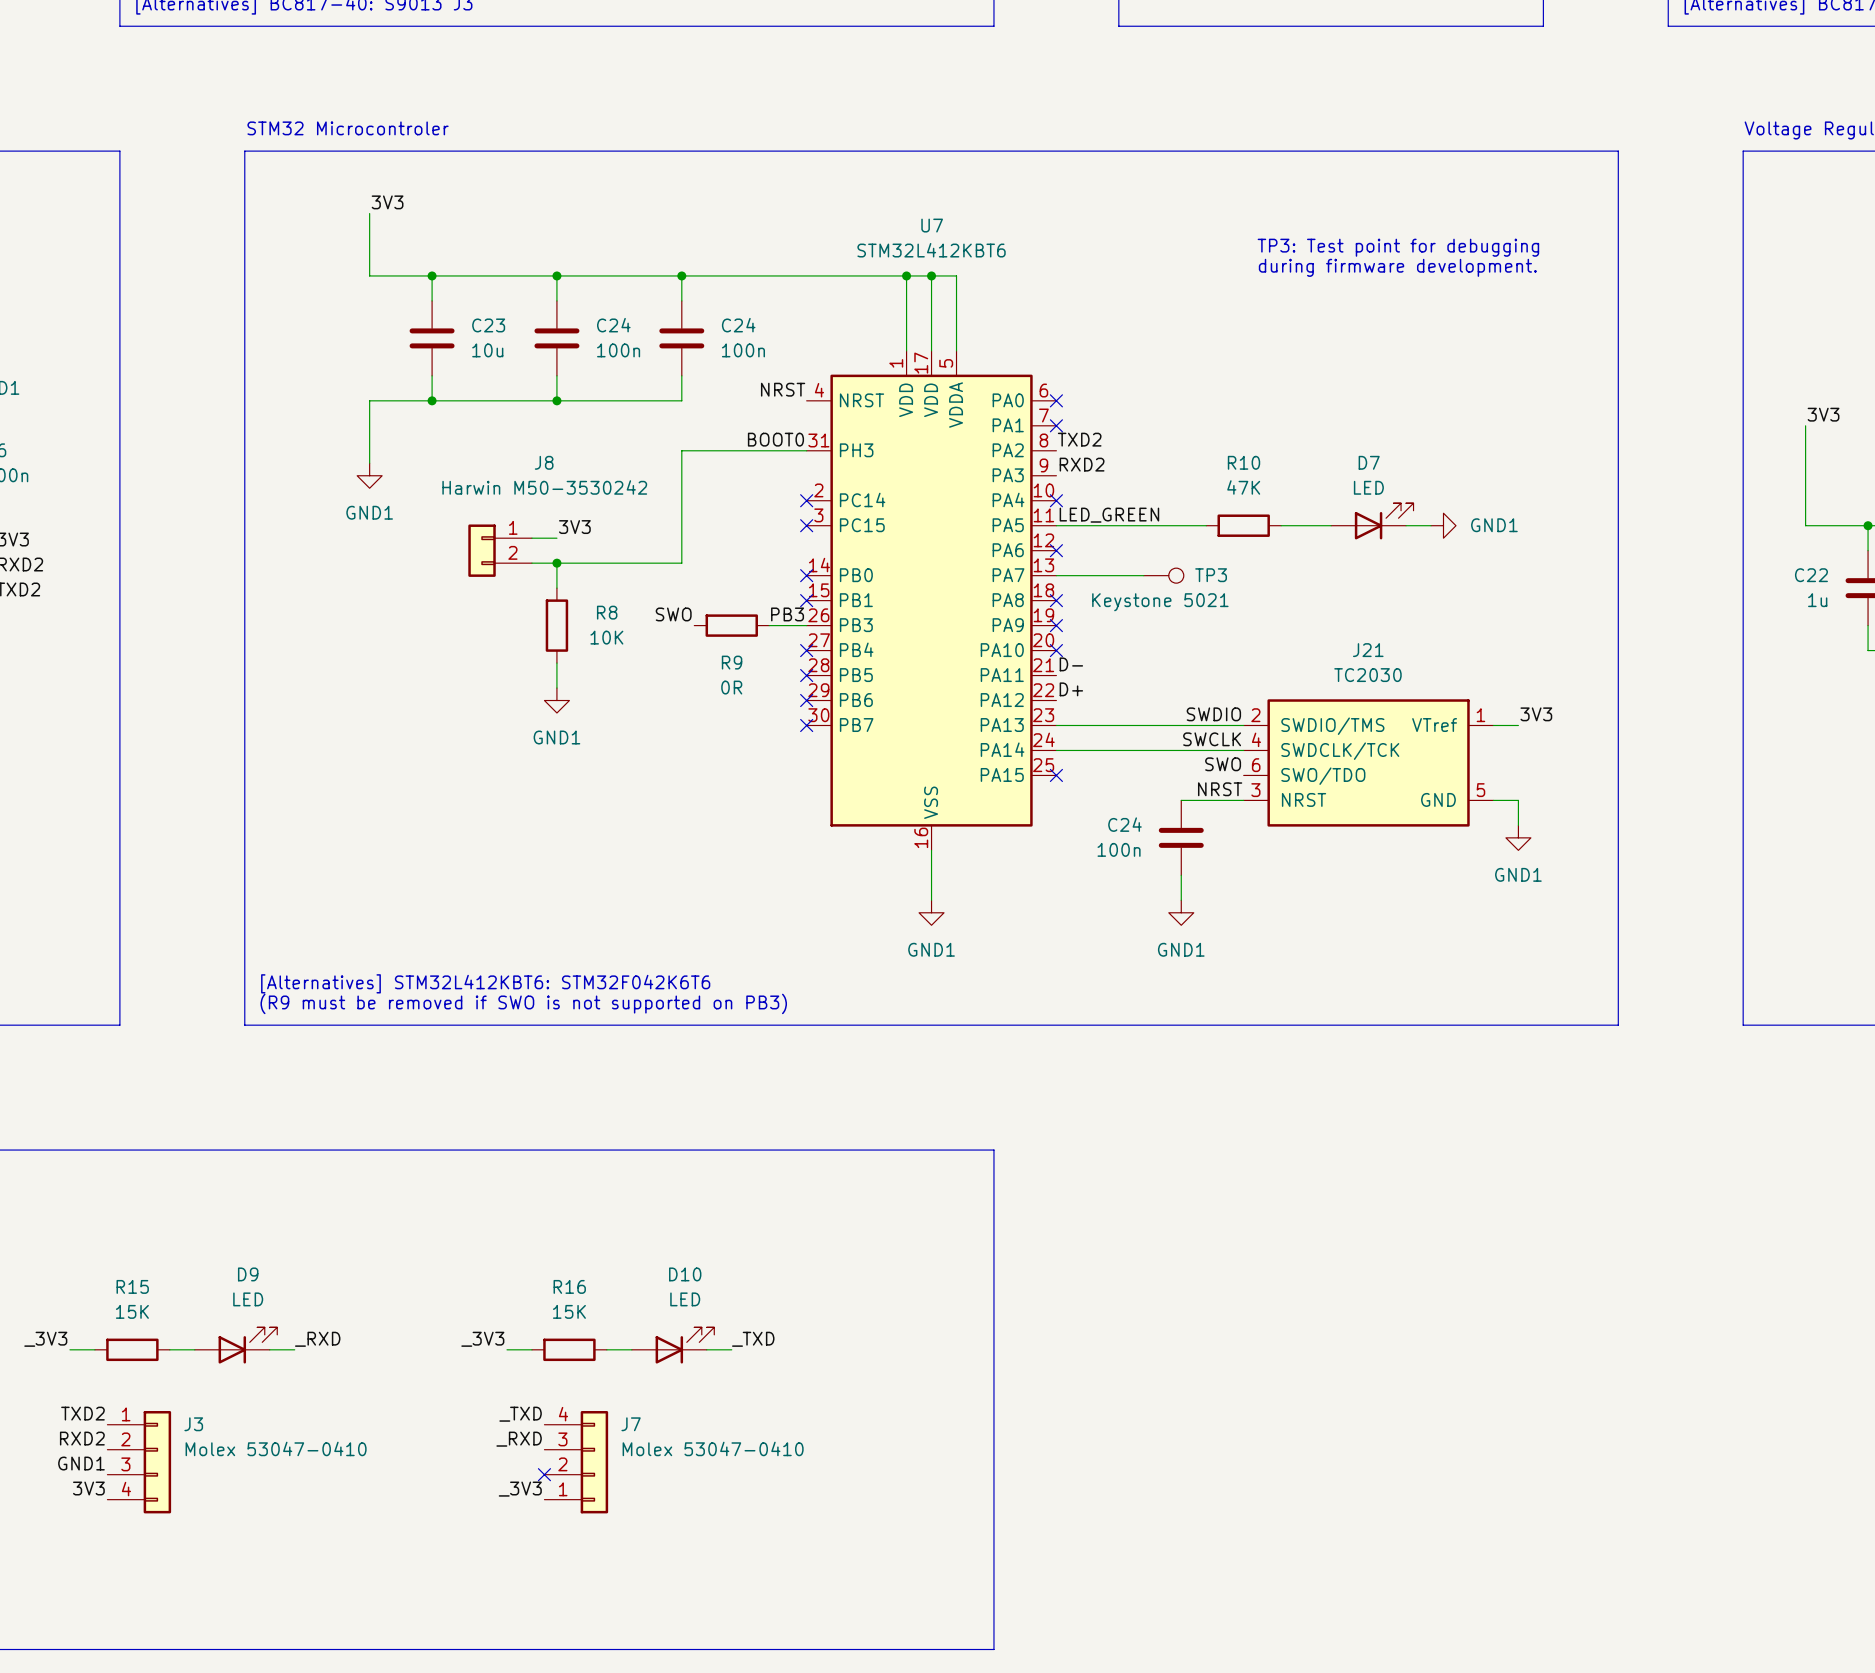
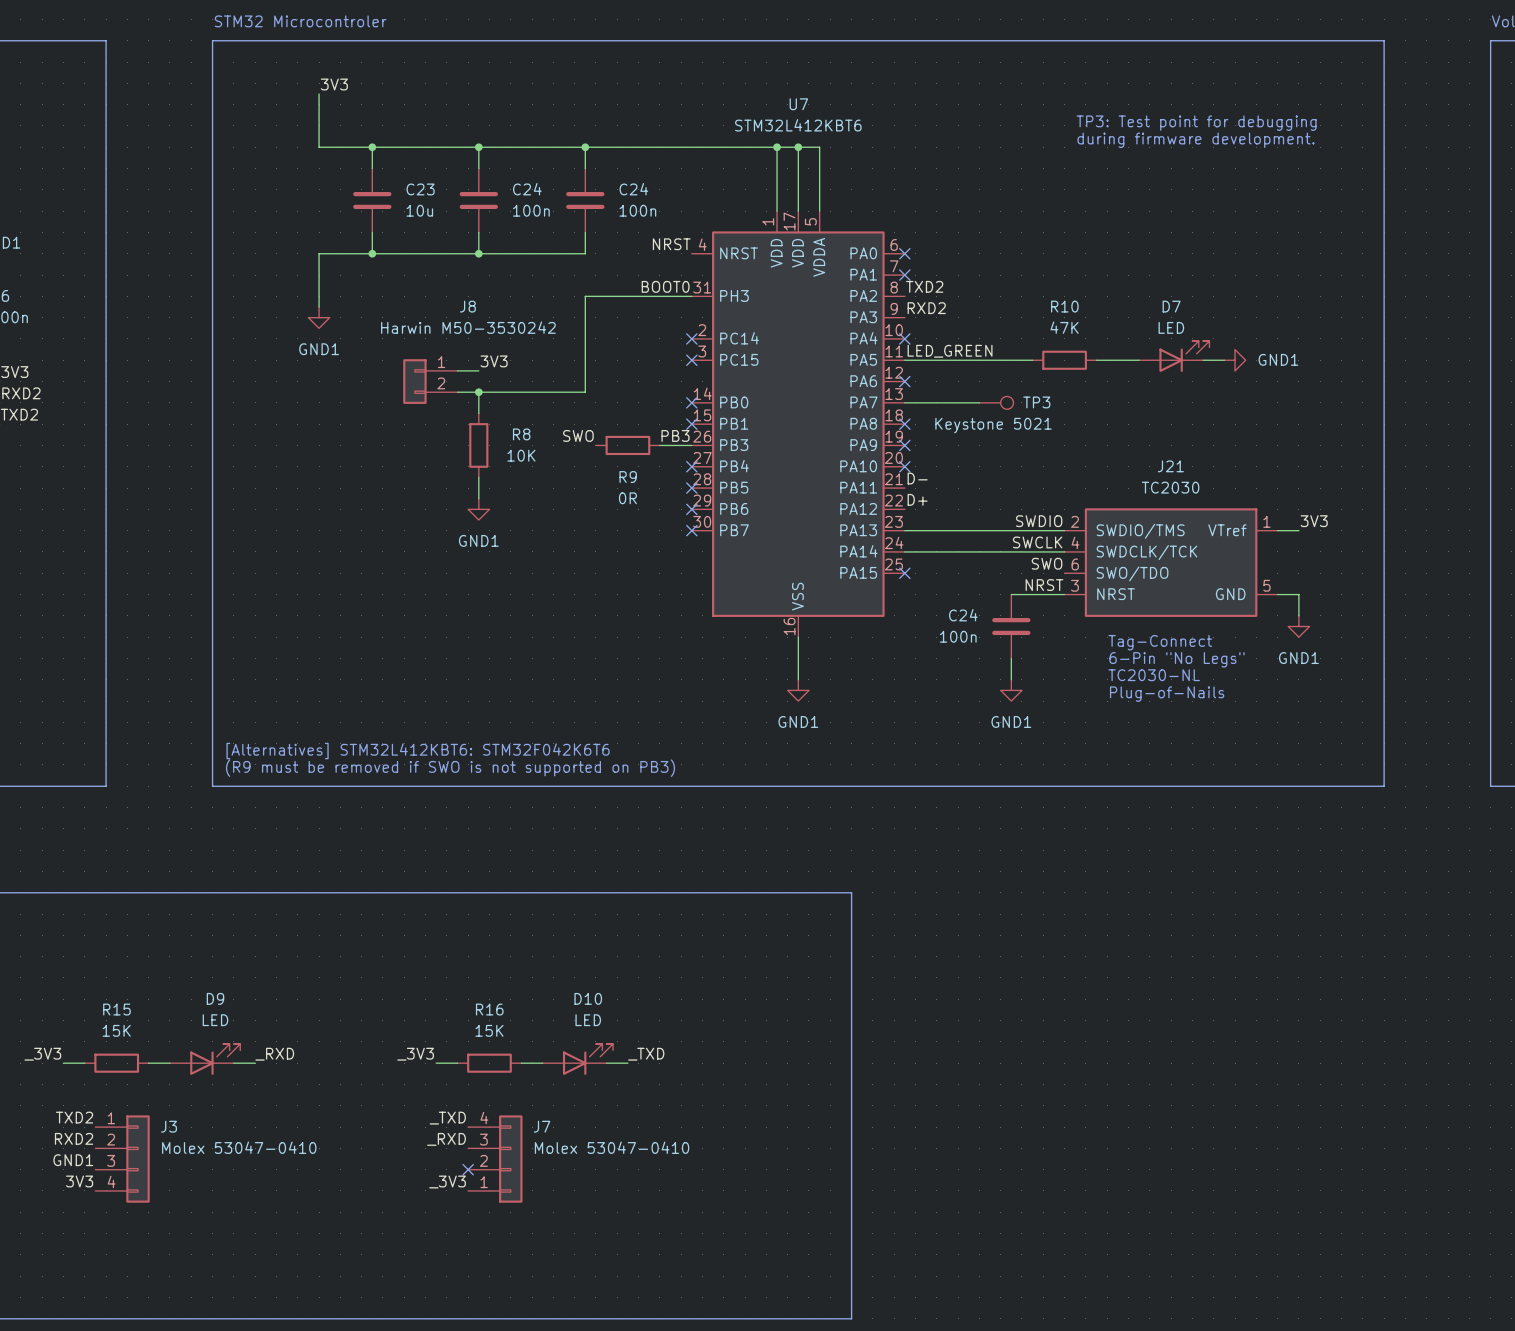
text: none -> Tag-Connect (1160, 642)
text: none -> 6-Pin "No Legs" (1177, 659)
text: none -> TC2030-NL (1154, 675)
text: none -> Plug-of-Nails (1167, 694)

